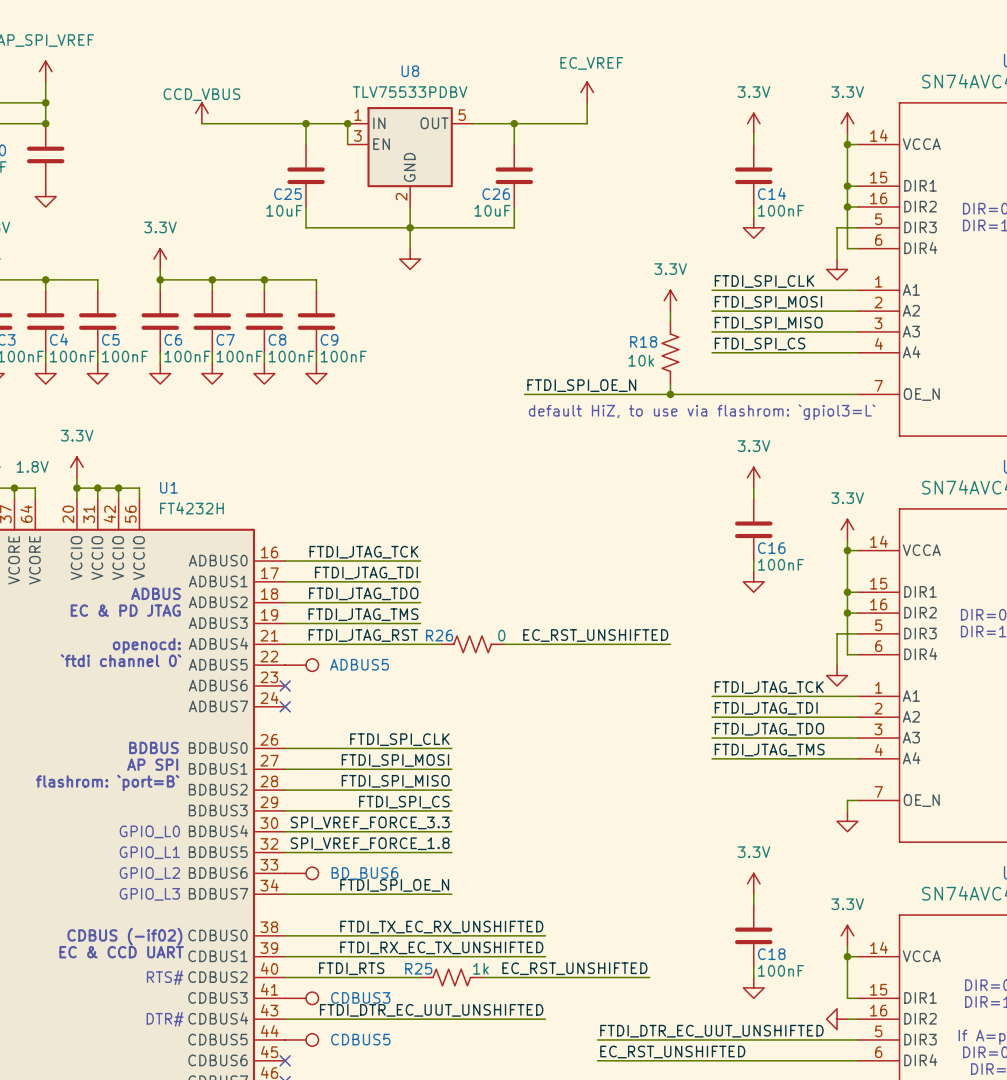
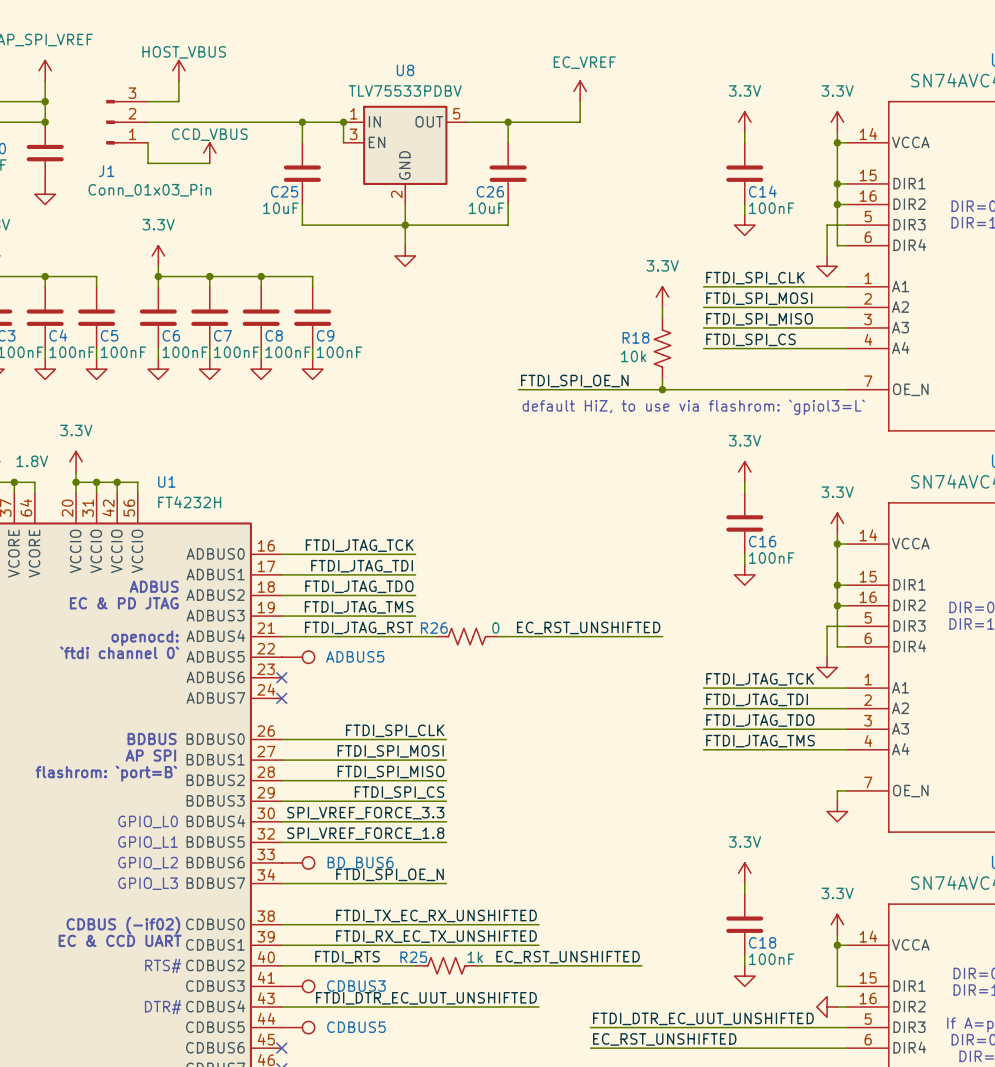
power symbol: none -> HOST_VBUS (178, 70)
wire: none -> (178, 81) (178, 101) (148, 101)
power symbol position: CCD_VBUS (201, 113) -> CCD_VBUS (209, 153)
J1: none -> Conn_01x03_Pin (127, 122)
wire: none -> (148, 122) (199, 122)
wire: none -> (148, 142) (148, 163) (209, 163)

